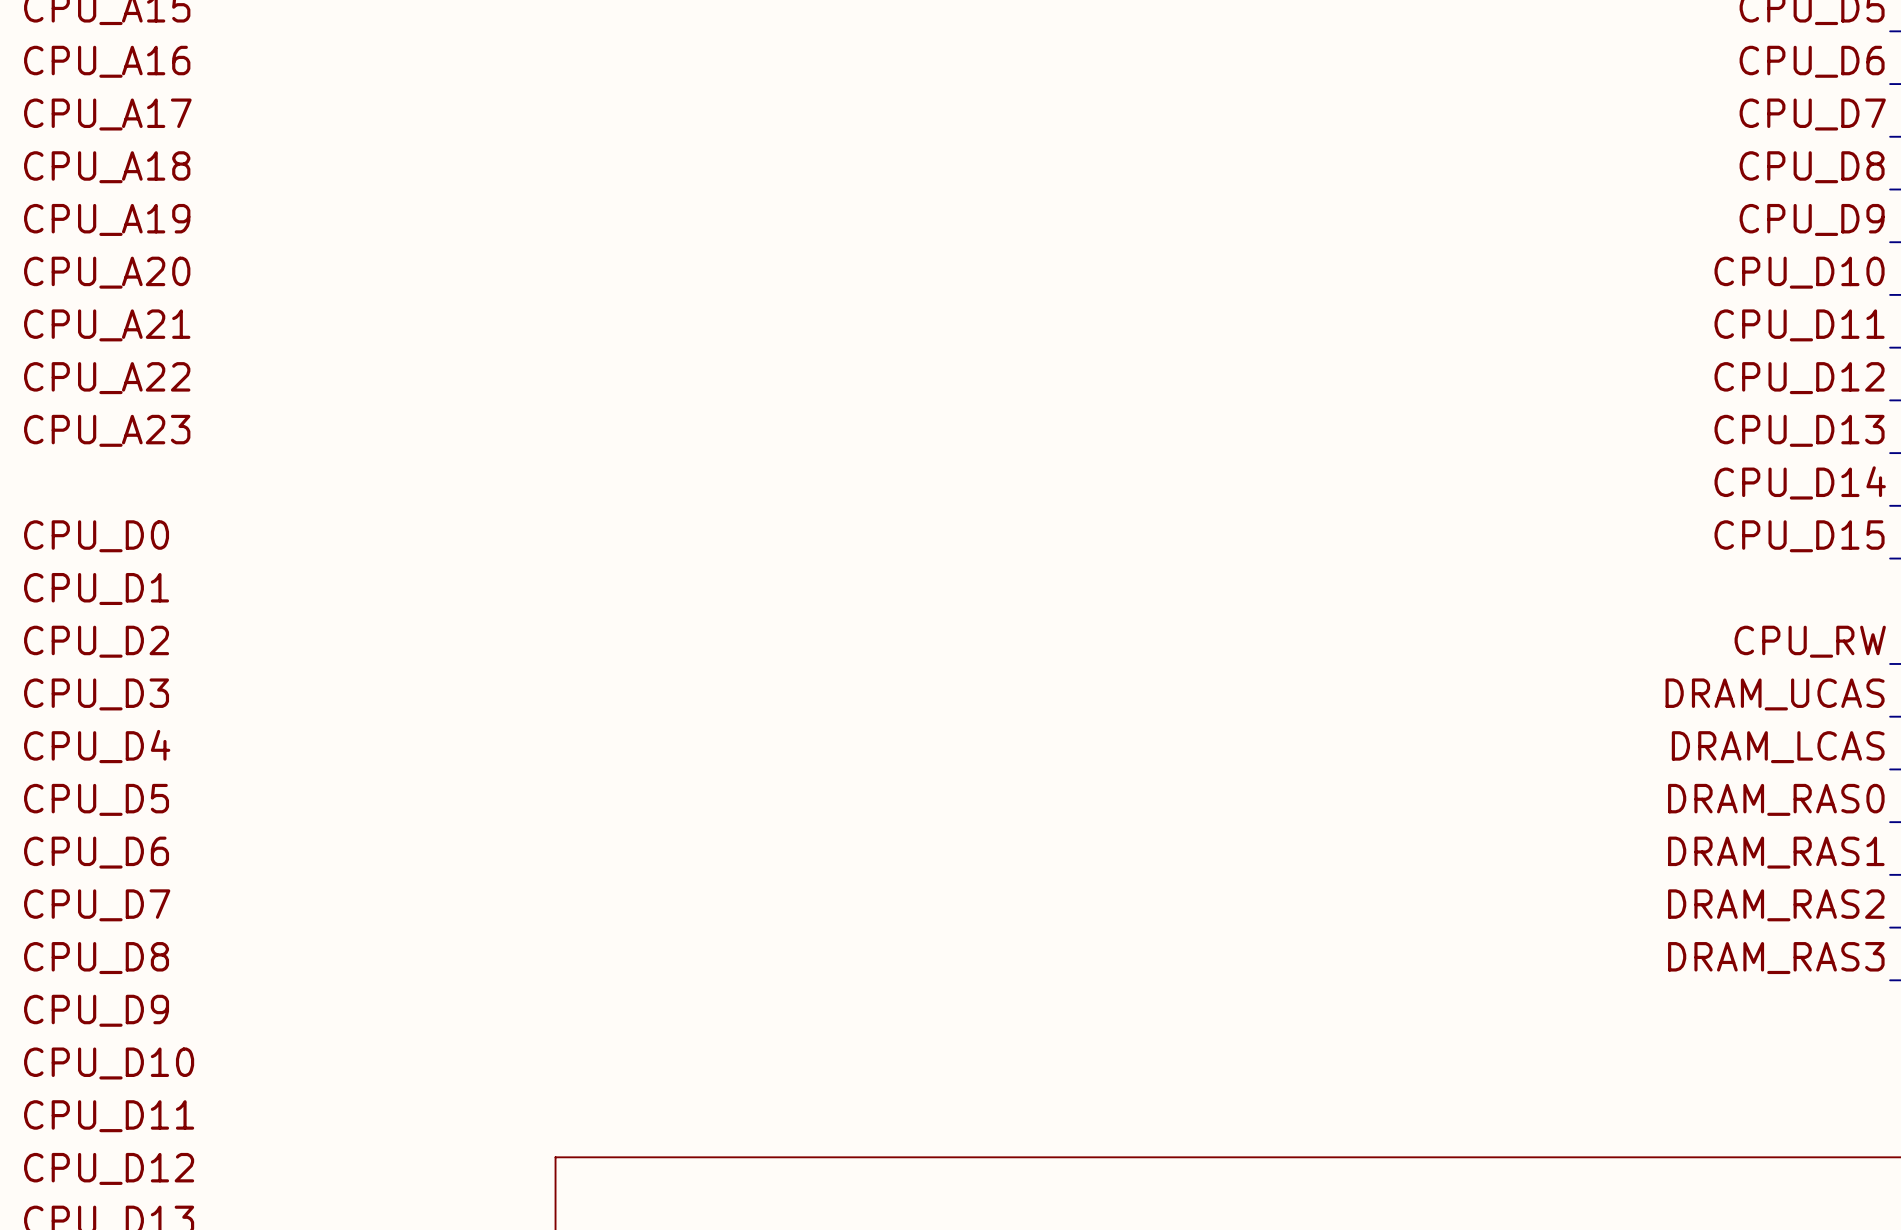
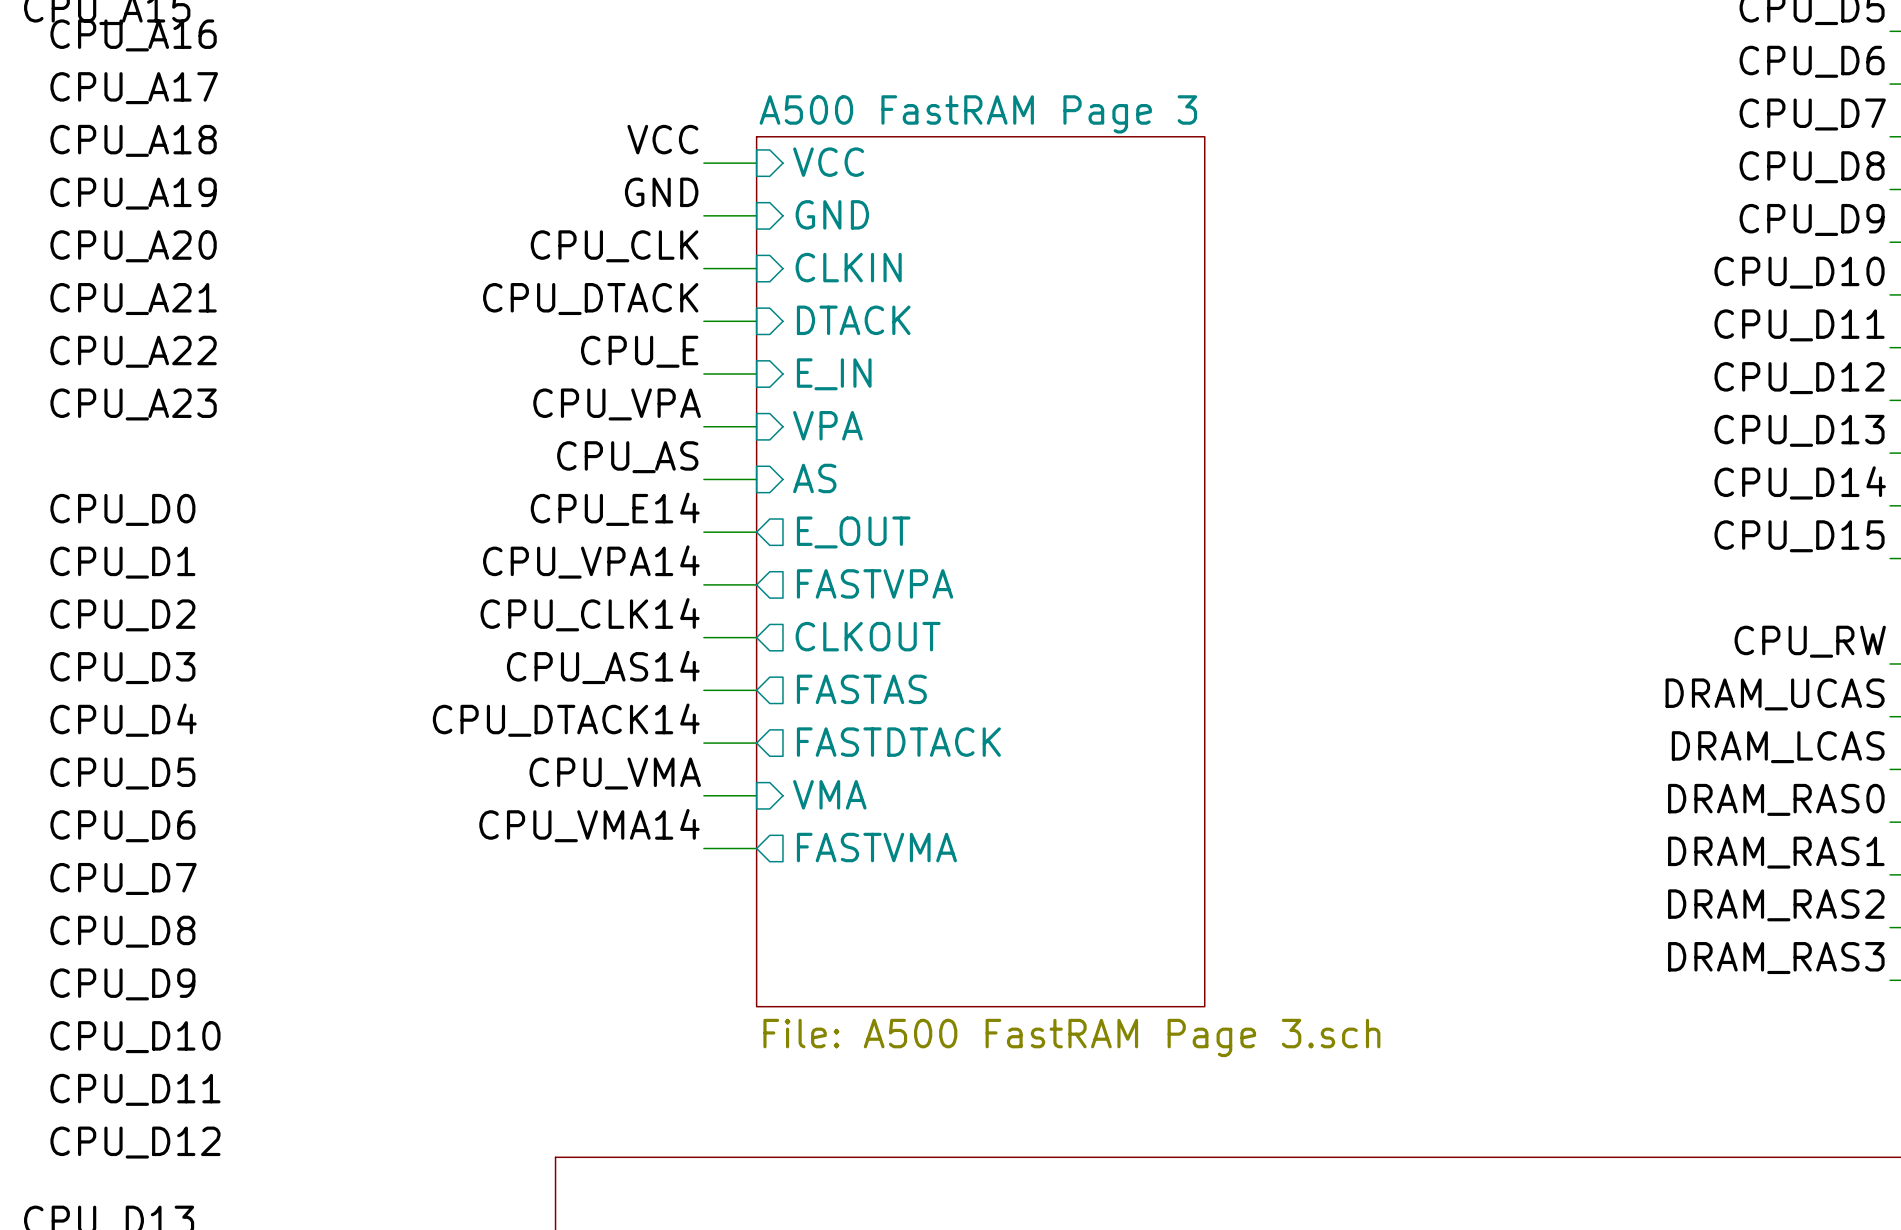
label position: CPU_A16 (107, 61) -> CPU_A16 (133, 35)
label position: CPU_A17 (107, 114) -> CPU_A17 (134, 88)
label: none -> VCC (662, 139)
sheet pin: none -> VCC (828, 162)
wire: none -> (703, 163) (756, 163)
label position: CPU_A18 (107, 167) -> CPU_A18 (133, 140)
label: none -> GND (661, 192)
sheet pin: none -> GND (832, 214)
wire: none -> (703, 215) (756, 215)
label position: CPU_A19 (107, 219) -> CPU_A19 (133, 193)
label: none -> CPU_CLK (614, 246)
sheet pin: none -> CLKIN (848, 267)
wire: none -> (703, 268) (756, 268)
label position: CPU_A20 (107, 272) -> CPU_A20 (133, 246)
label: none -> CPU_DTACK (590, 299)
sheet pin: none -> DTACK (853, 320)
wire: none -> (703, 321) (756, 321)
label position: CPU_A21 (107, 325) -> CPU_A21 (133, 299)
label: none -> CPU_E (639, 351)
wire: none -> (703, 374) (756, 374)
sheet pin: none -> E_IN (834, 374)
label position: CPU_A22 (107, 378) -> CPU_A22 (133, 351)
label: none -> CPU_VPA (617, 404)
sheet pin: none -> VPA (827, 425)
wire: none -> (703, 426) (756, 426)
label position: CPU_A23 (107, 430) -> CPU_A23 (133, 404)
label: none -> CPU_AS (627, 457)
sheet pin: none -> AS (814, 478)
wire: none -> (703, 479) (756, 479)
label: none -> CPU_E14 (615, 509)
wire: none -> (703, 532) (756, 532)
sheet pin: none -> E_OUT (853, 532)
label position: CPU_D0 (96, 536) -> CPU_D0 (122, 509)
label: none -> CPU_VPA14 (591, 562)
sheet A500 FastRAM Page 3: none -> File: A500 FastRAM Page 3.sch (980, 571)
sheet pin: none -> FASTVPA (875, 583)
wire: none -> (703, 584) (756, 584)
label position: CPU_D1 (96, 588) -> CPU_D1 (122, 562)
label: none -> CPU_CLK14 (590, 614)
sheet pin: none -> CLKOUT (868, 636)
wire: none -> (703, 637) (756, 637)
label position: CPU_D2 (96, 641) -> CPU_D2 (122, 615)
label: none -> CPU_AS14 (603, 667)
sheet pin: none -> FASTAS (861, 689)
wire: none -> (703, 690) (756, 690)
label position: CPU_D3 (96, 694) -> CPU_D3 (122, 668)
label: none -> CPU_DTACK14 (566, 720)
sheet pin: none -> FASTDTACK (898, 742)
wire: none -> (703, 743) (756, 743)
label position: CPU_D4 (97, 746) -> CPU_D4 (123, 720)
label: none -> CPU_VMA (615, 773)
sheet pin: none -> VMA (829, 794)
wire: none -> (703, 795) (756, 795)
label position: CPU_D5 (96, 799) -> CPU_D5 (122, 773)
label: none -> CPU_VMA14 (589, 825)
sheet pin: none -> FASTVMA (876, 847)
wire: none -> (703, 848) (756, 848)
label position: CPU_D6 (96, 852) -> CPU_D6 (122, 826)
label position: CPU_D7 (97, 905) -> CPU_D7 (123, 878)
label position: CPU_D8 (96, 958) -> CPU_D8 (122, 931)
label position: CPU_D9 (96, 1010) -> CPU_D9 (122, 984)
label position: CPU_D10 (109, 1063) -> CPU_D10 (135, 1037)
label position: CPU_D11 (109, 1116) -> CPU_D11 (135, 1089)
label position: CPU_D12 (109, 1168) -> CPU_D12 (135, 1142)

